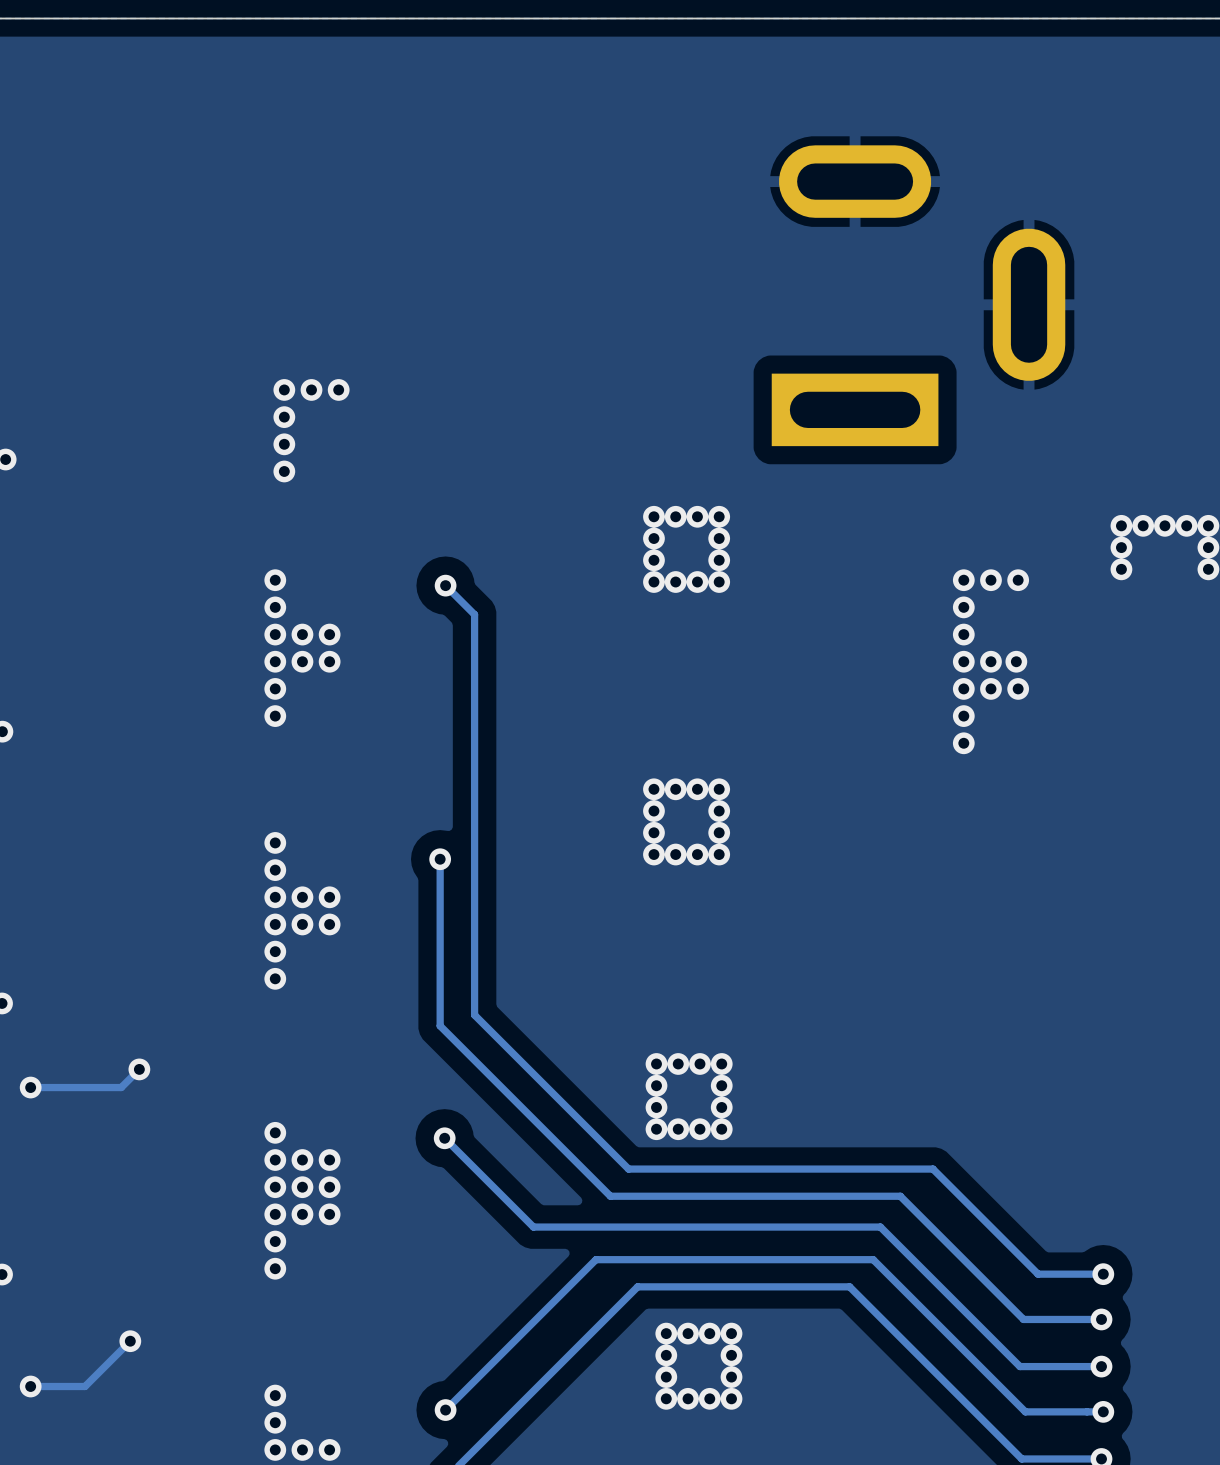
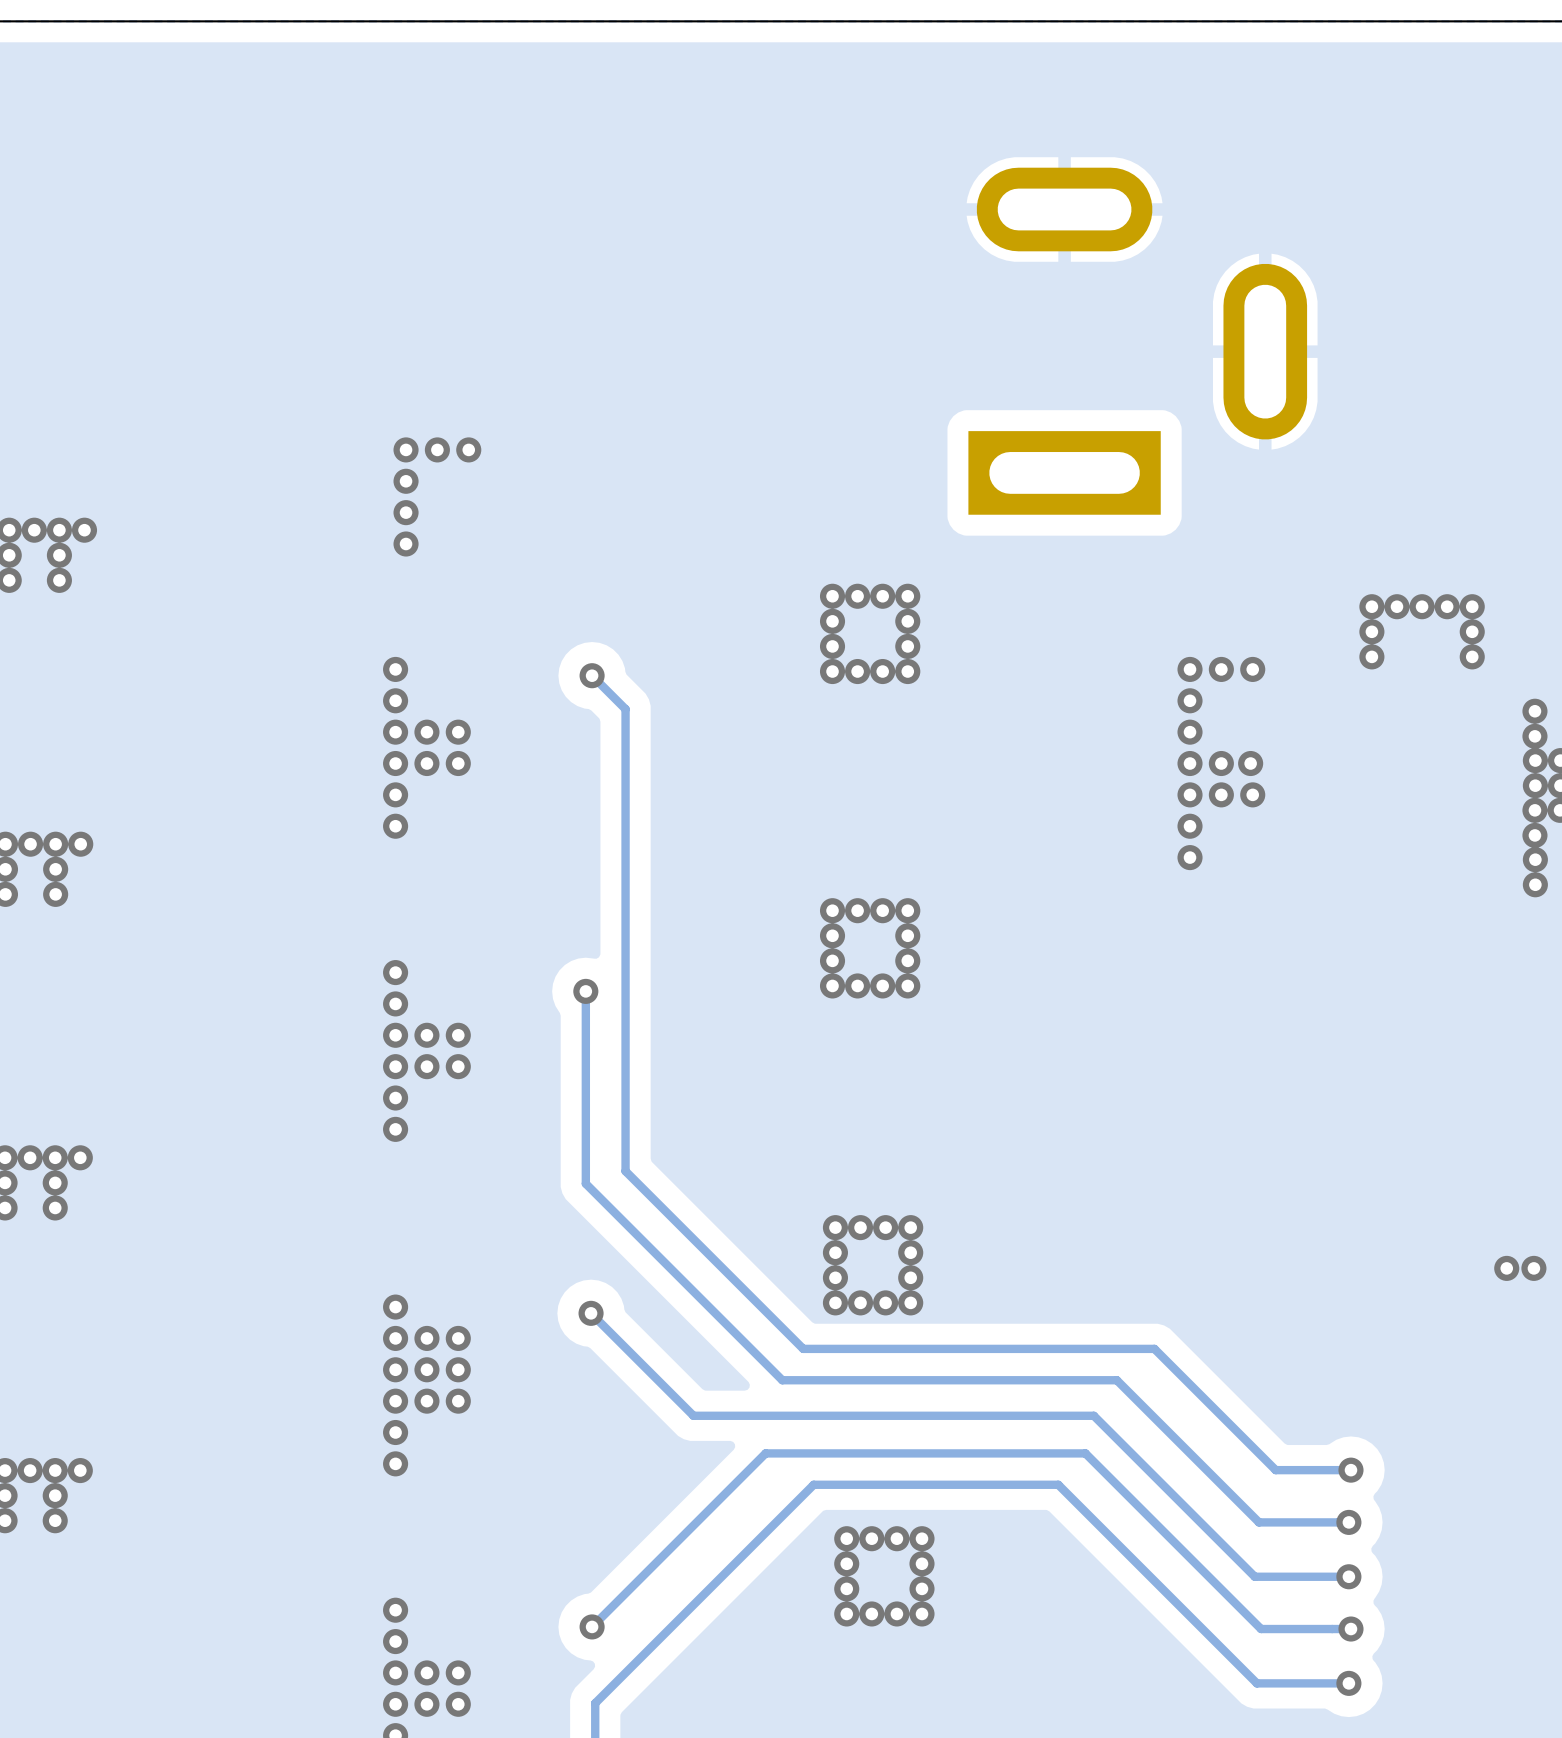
track: (139, 1069) (121, 1087) (30, 1087) -> none
via: (139, 1069) -> none
via: (30, 1087) -> none
track: (130, 1341) (85, 1386) (30, 1386) -> none
via: (130, 1341) -> none
via: (30, 1386) -> none

